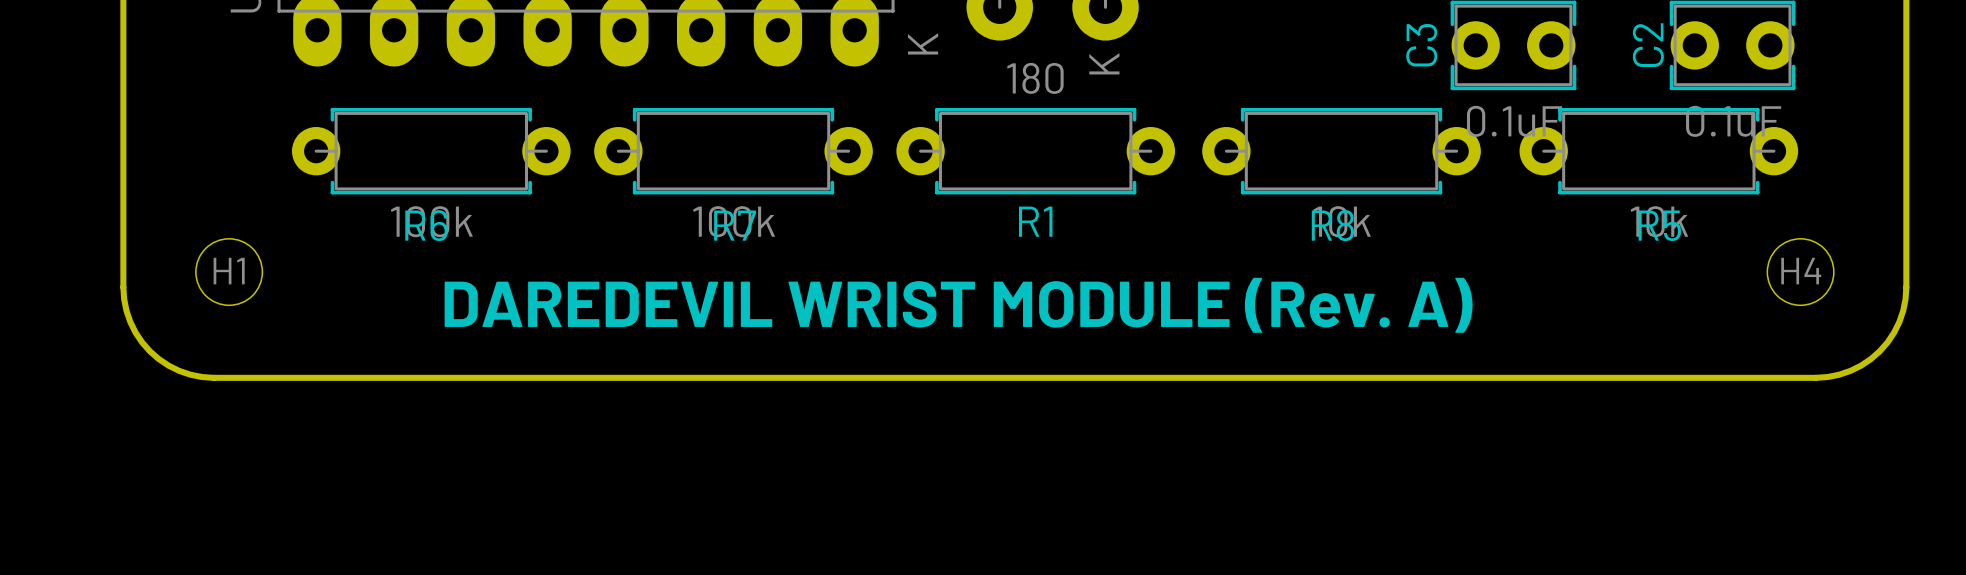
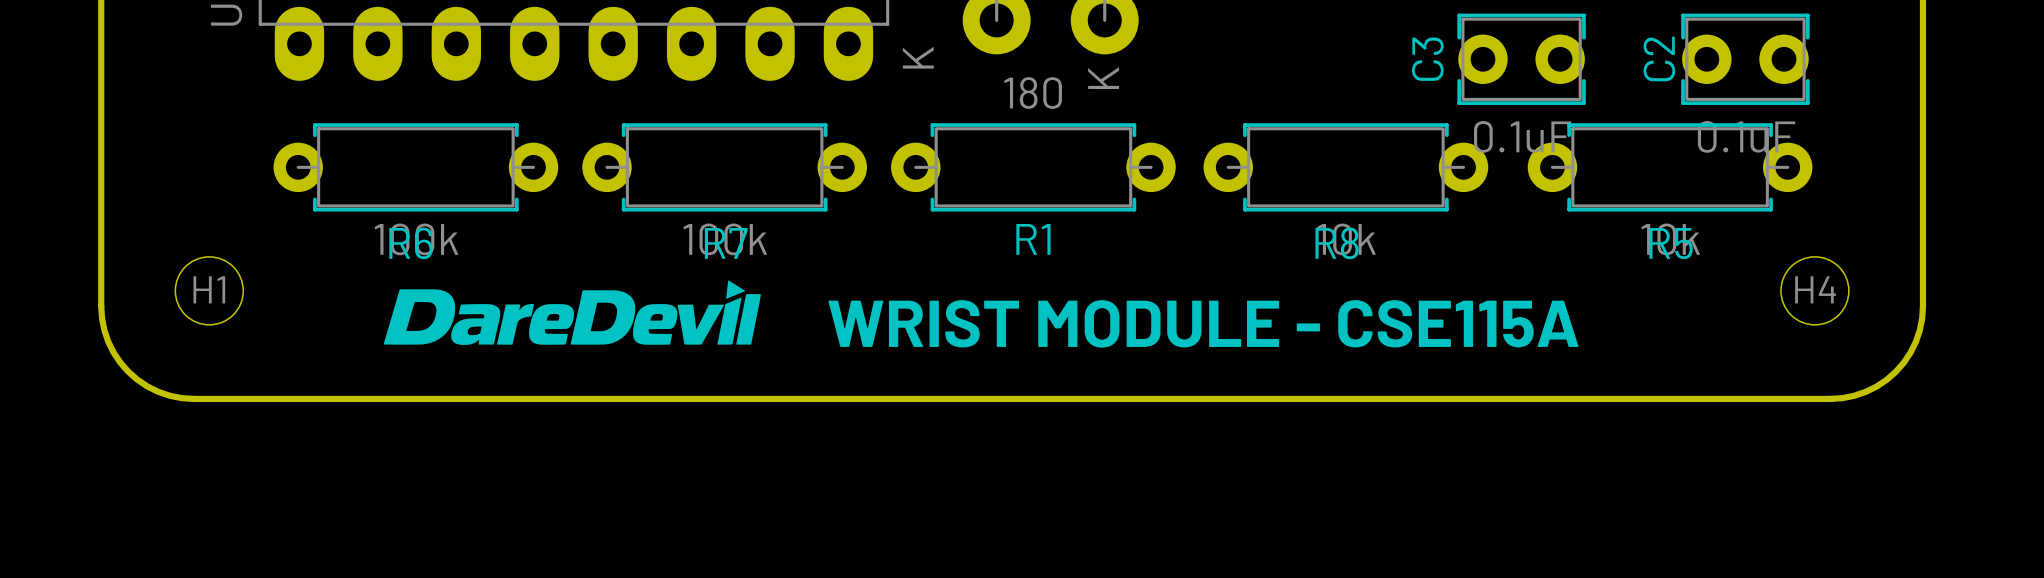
drawing: none -> [383, 280, 761, 345]
text: none -> WRIST MODULE - CSE115A (1203, 323)
text: DAREDEVIL WRIST MODULE (Rev. A) (958, 305) -> none

